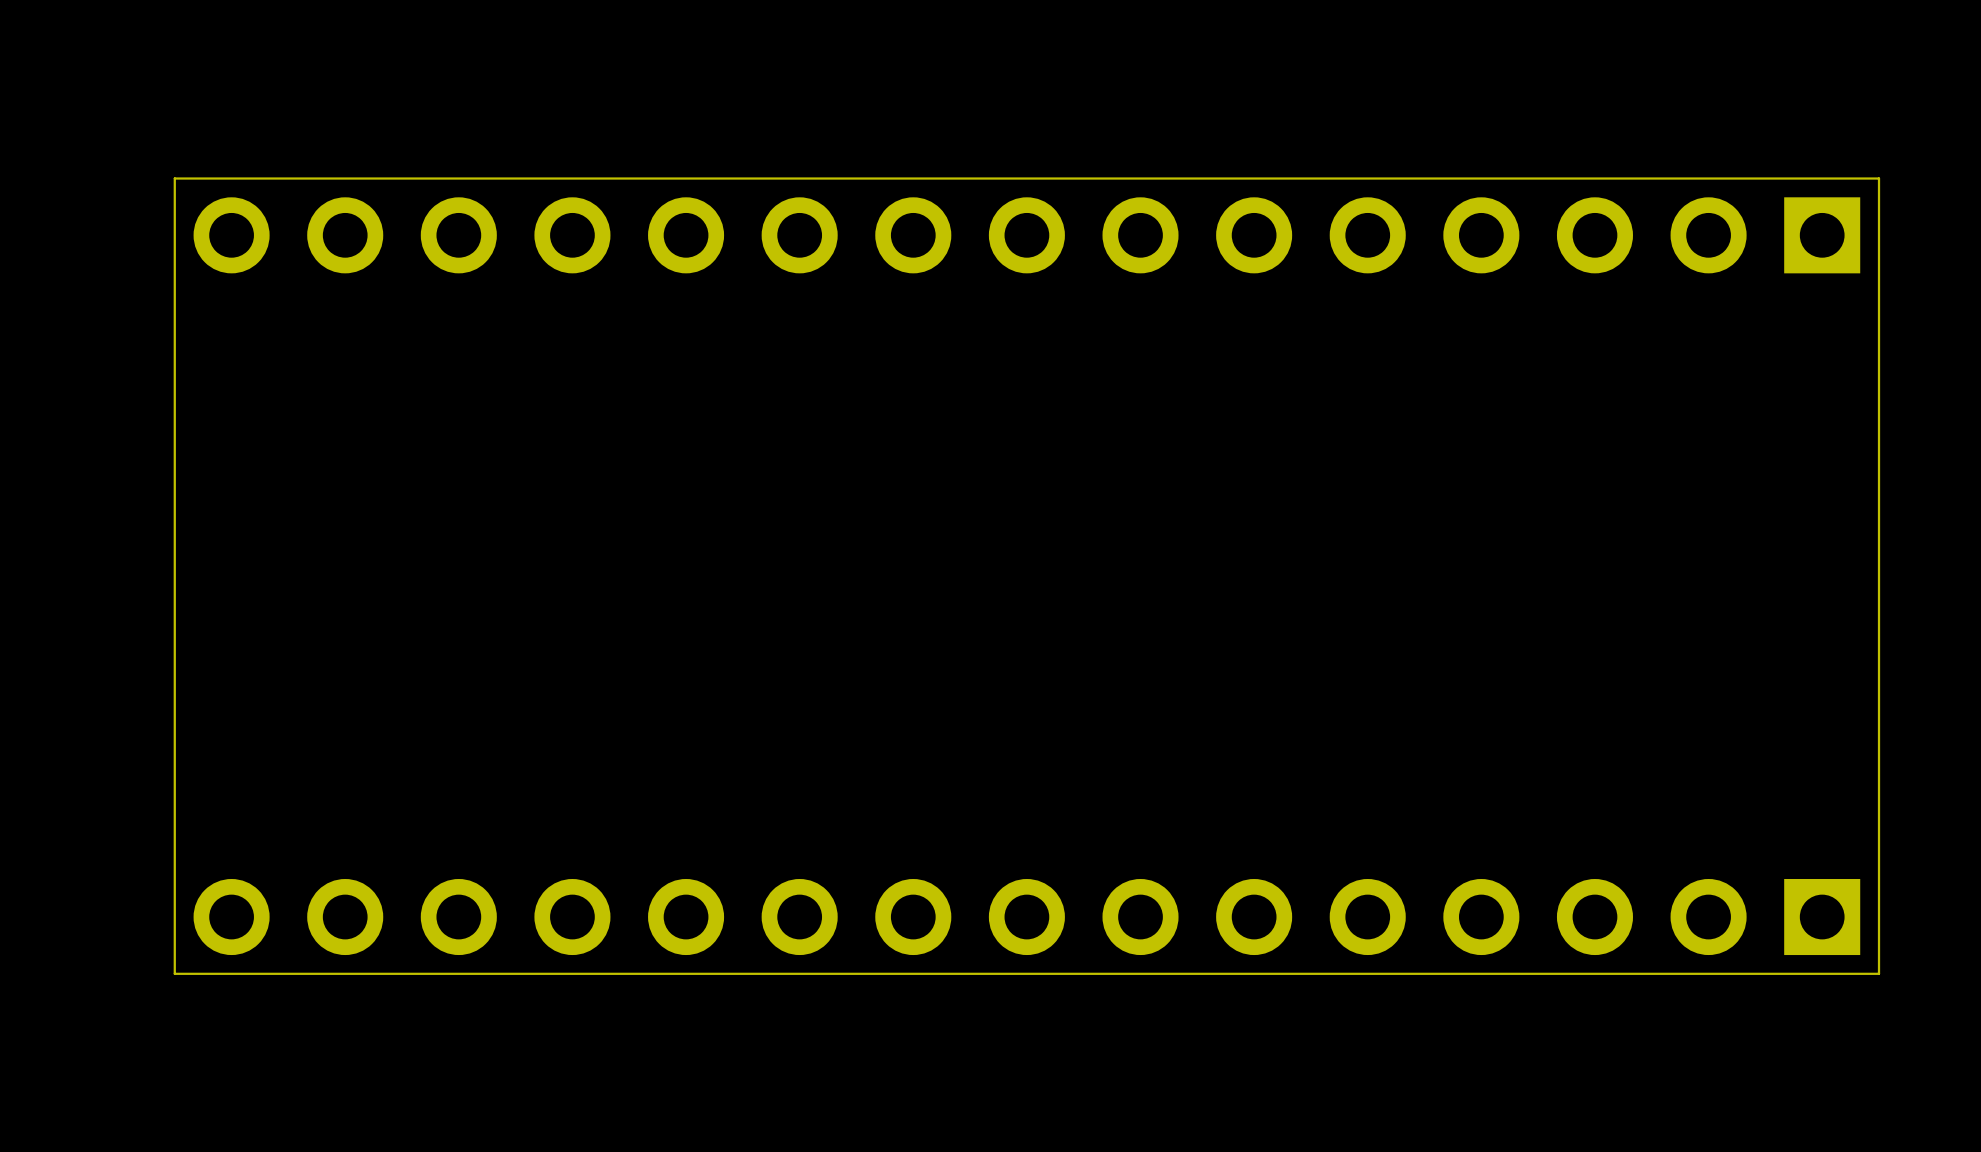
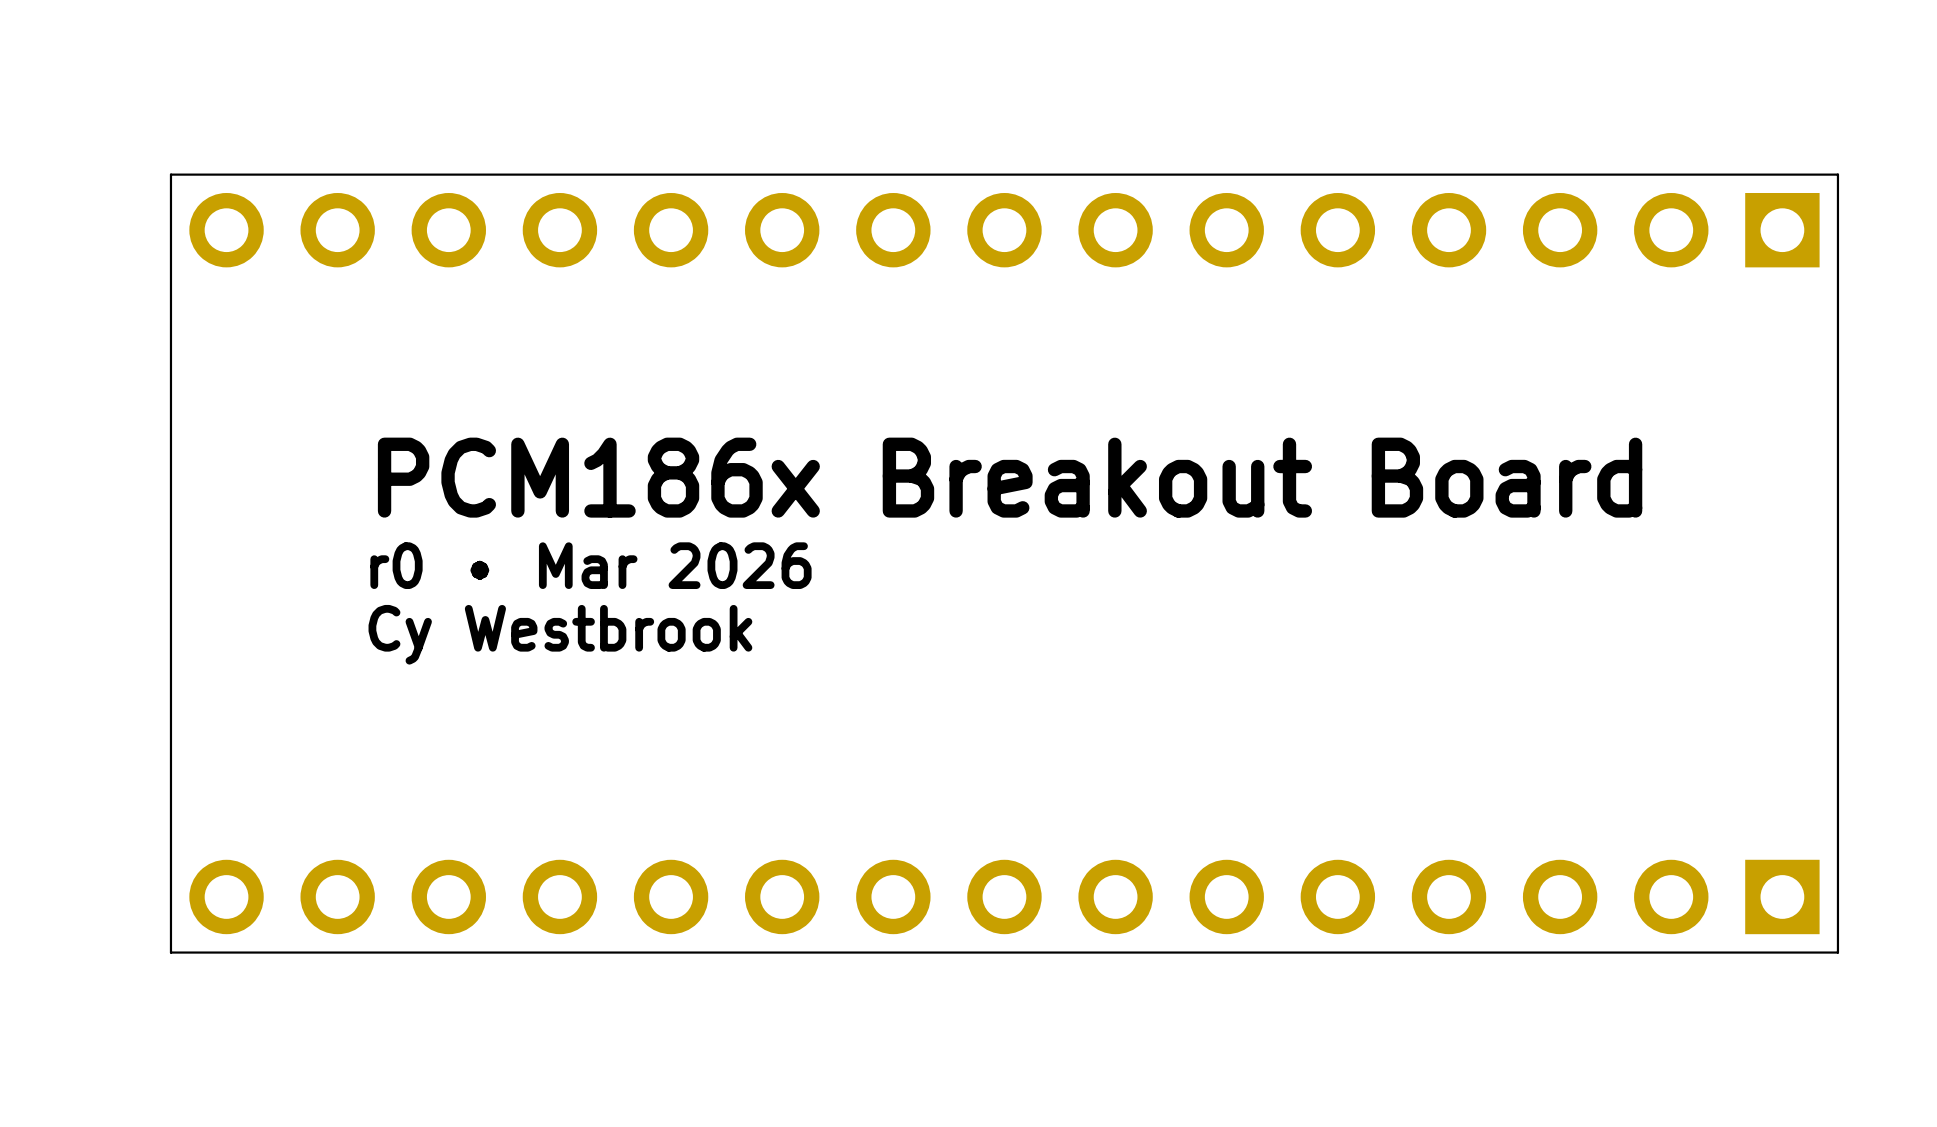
text: none -> PCM186x Breakout Board (1010, 477)
text: none -> r0 • Mar 2026 (590, 565)
text: none -> Cy Westbrook (560, 634)

